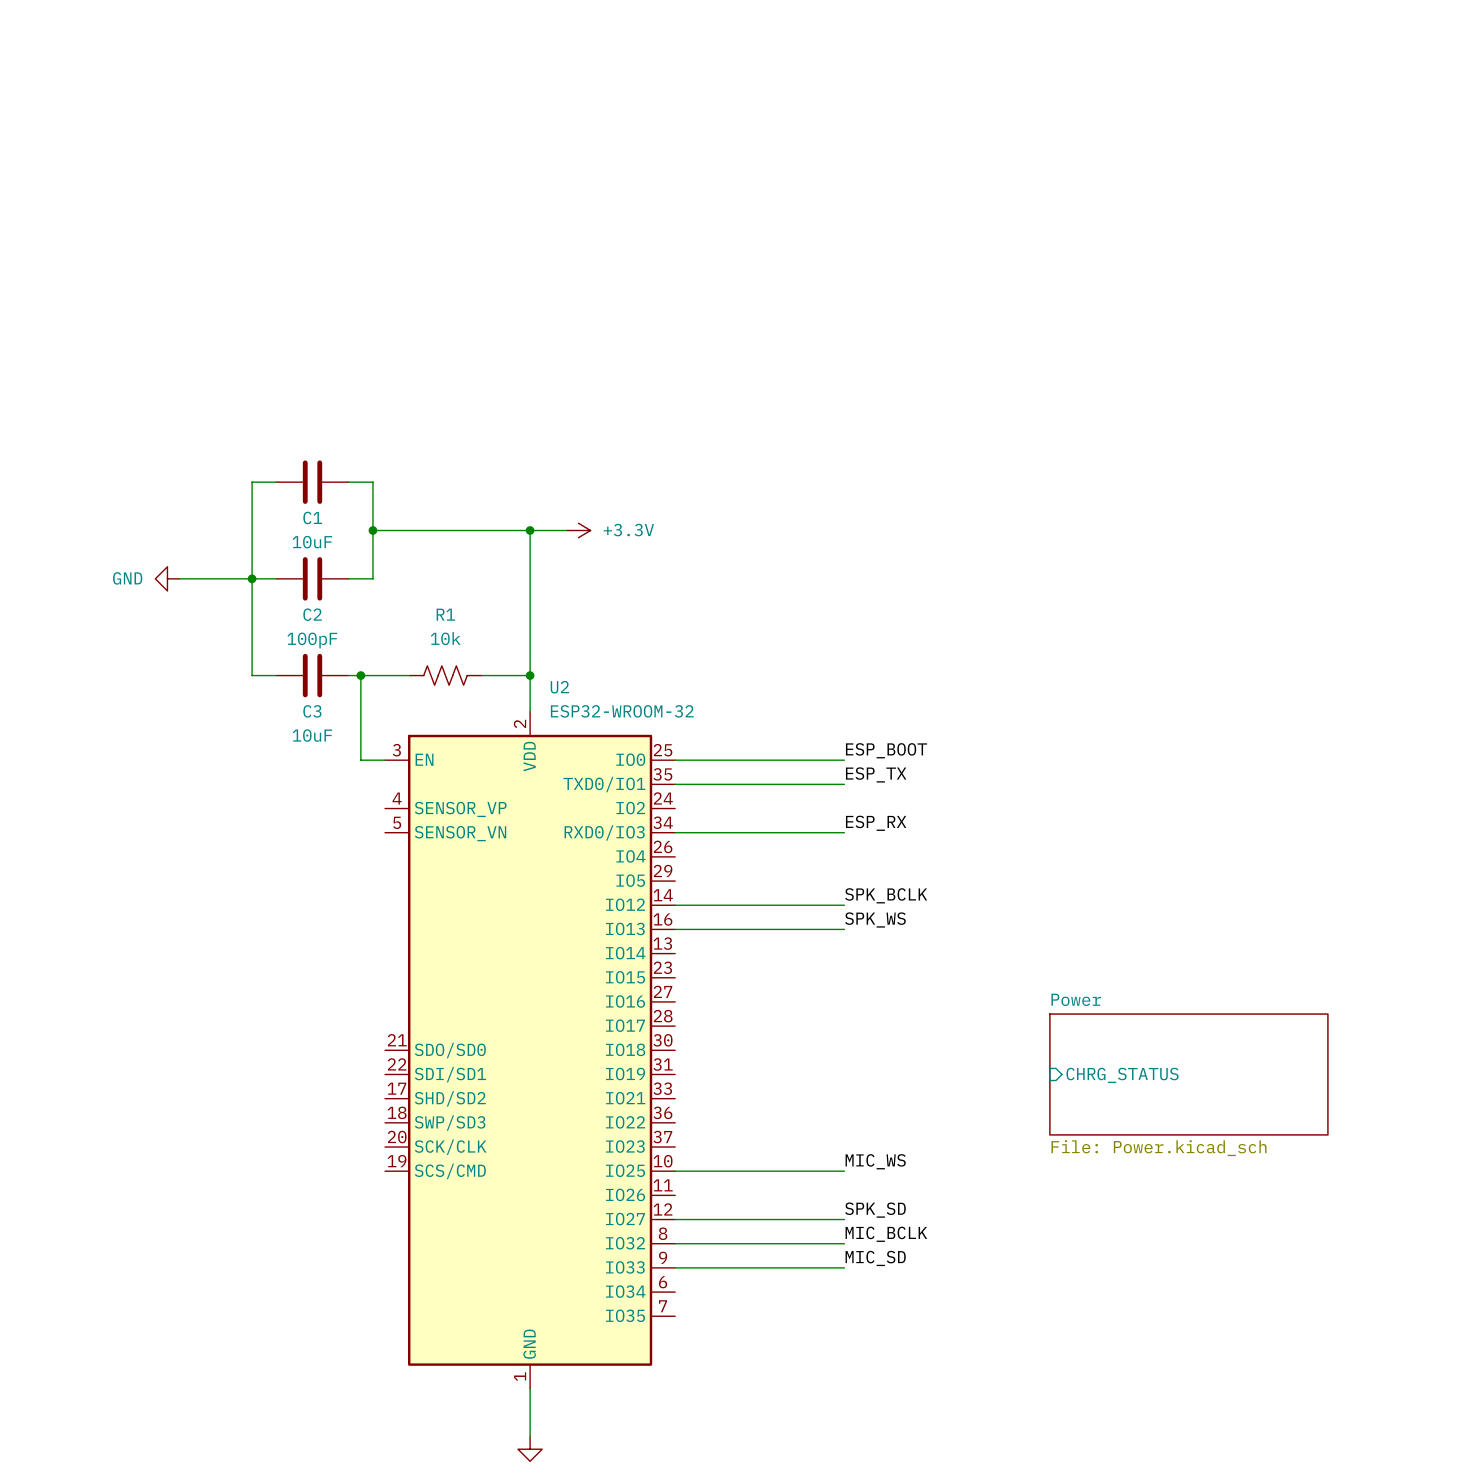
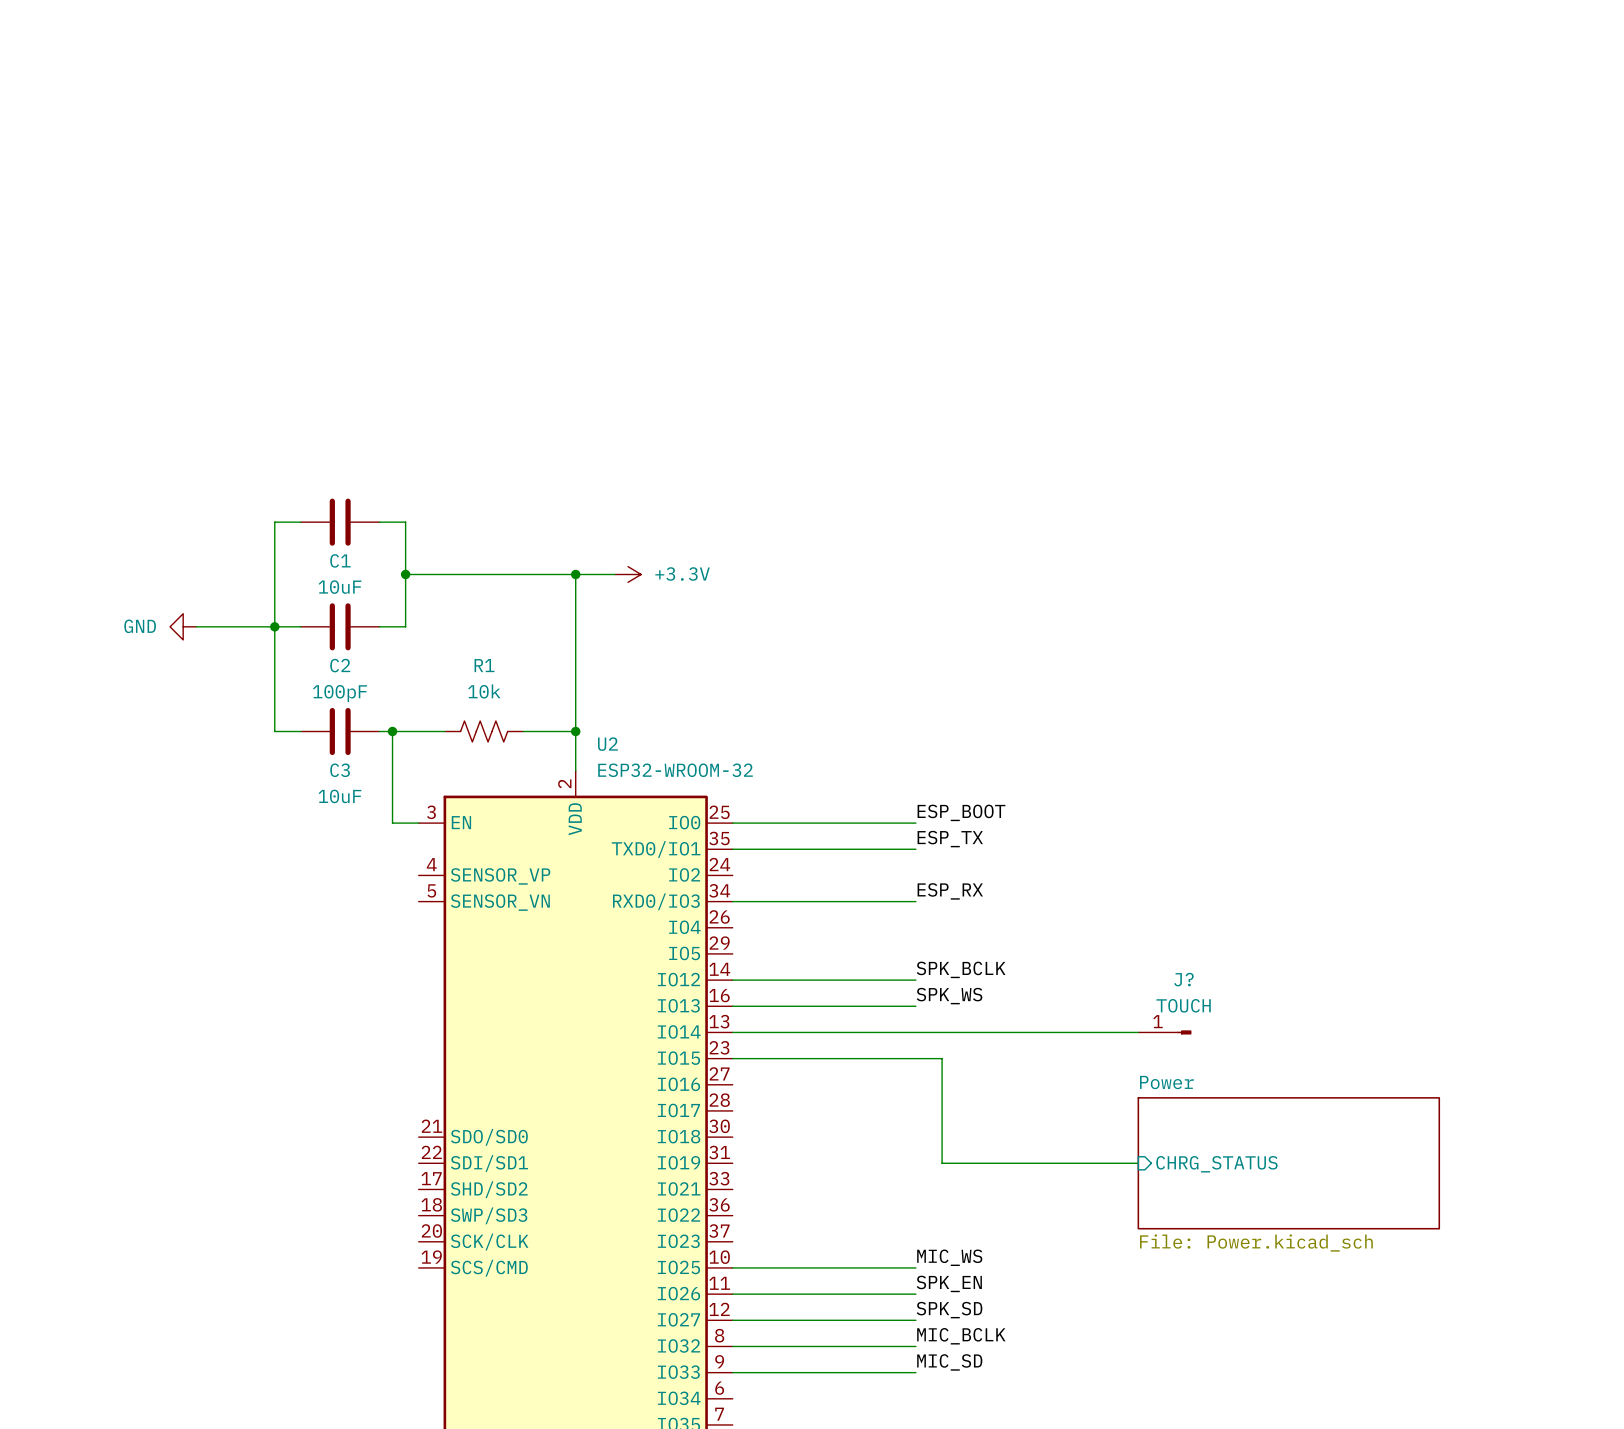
wire: none -> (732, 1032) (1138, 1032)
J?: none -> TOUCH (1164, 1032)
wire: none -> (732, 1058) (942, 1058) (942, 1163) (1138, 1163)
label: none -> SPK_EN (949, 1283)
wire: none -> (732, 1294) (915, 1294)

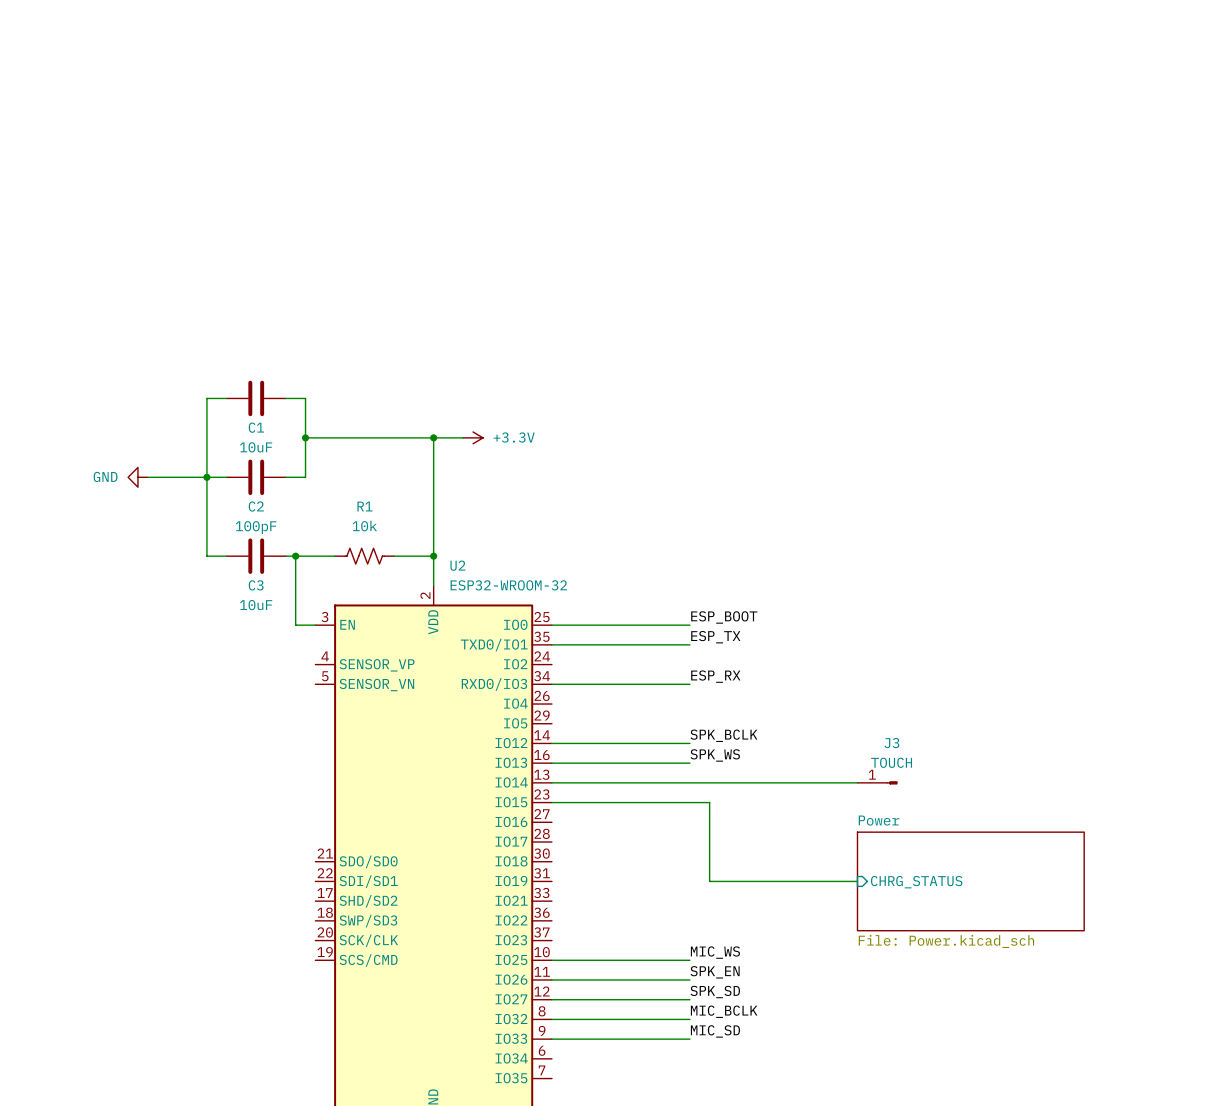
J? name: J? (1183, 979) -> J3 (891, 743)

